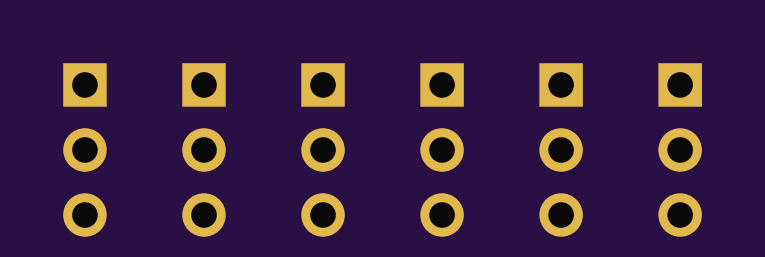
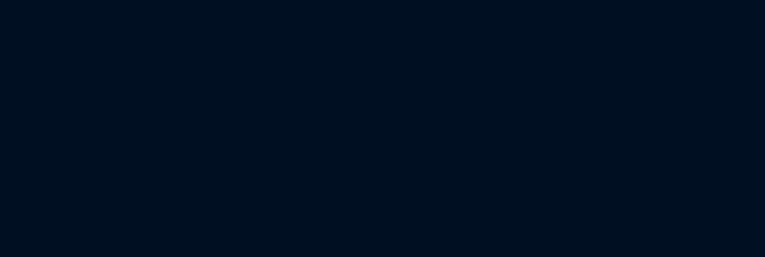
part: (84, 149) -> none
part: (204, 149) -> none
part: (323, 149) -> none
part: (442, 149) -> none
part: (561, 149) -> none
part: (680, 149) -> none

